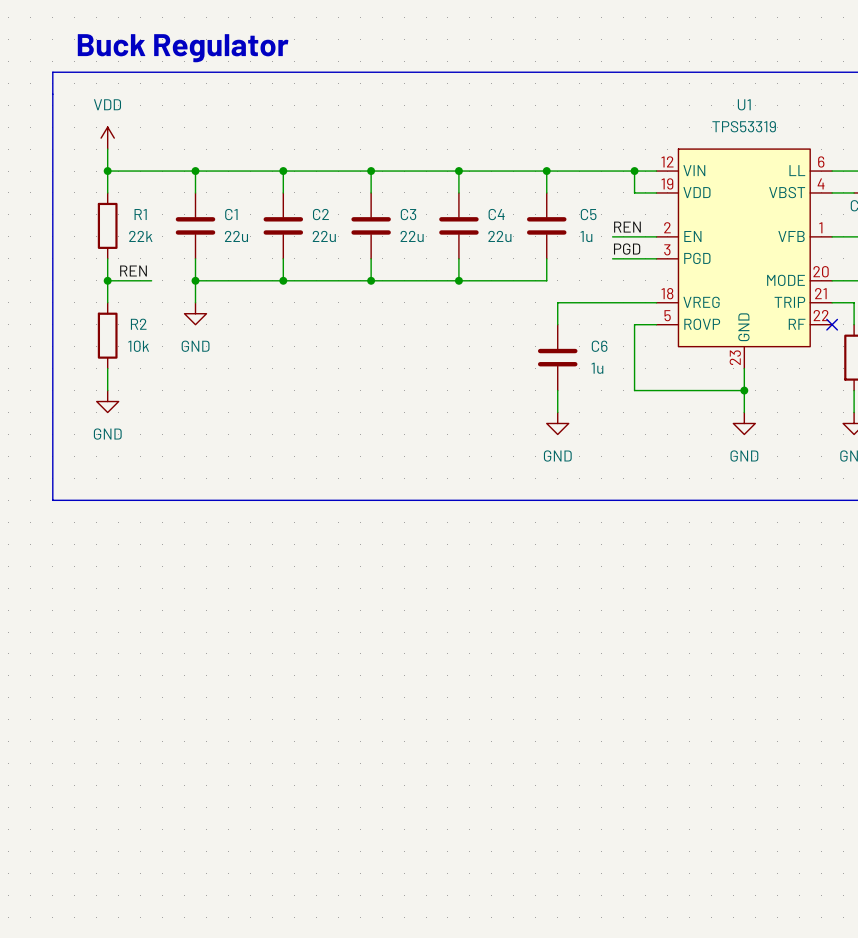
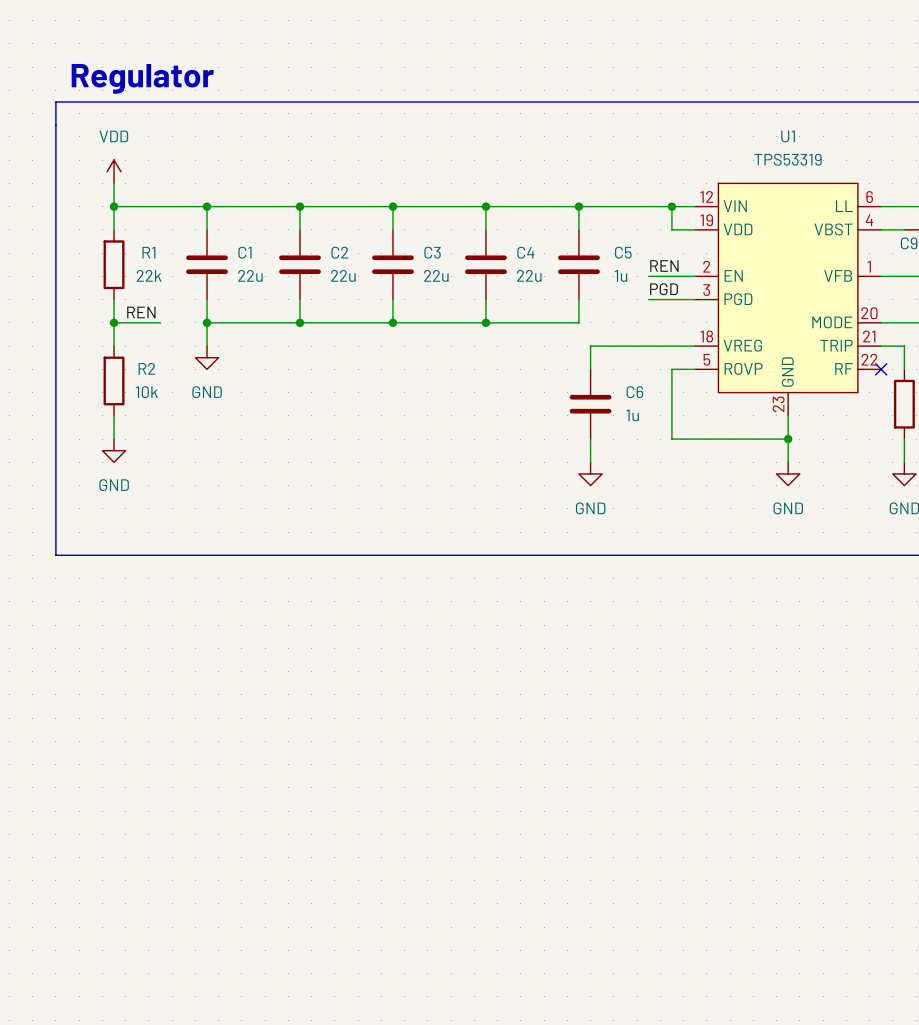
text: Buck Regulator (183, 48) -> Regulator (142, 78)

